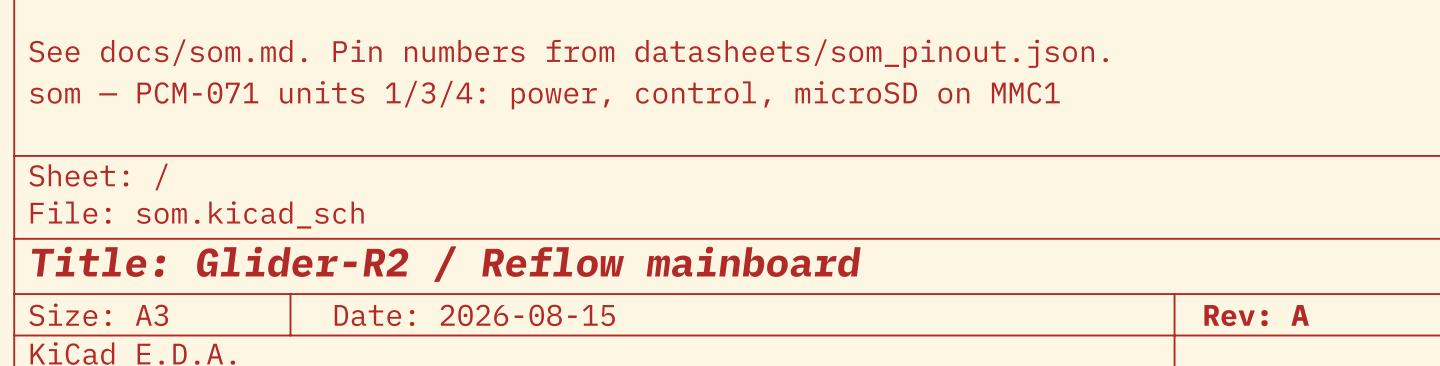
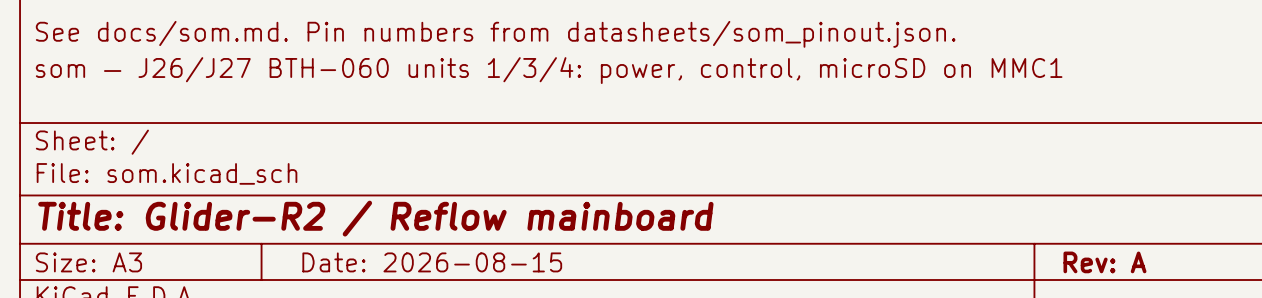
title block: som — PCM-071 units 1/3/4: power, control, microSD on MMC1 (544, 95) -> som — J26/J27 BTH-060 units 1/3/4: power, control, microSD on MMC1 (549, 70)

